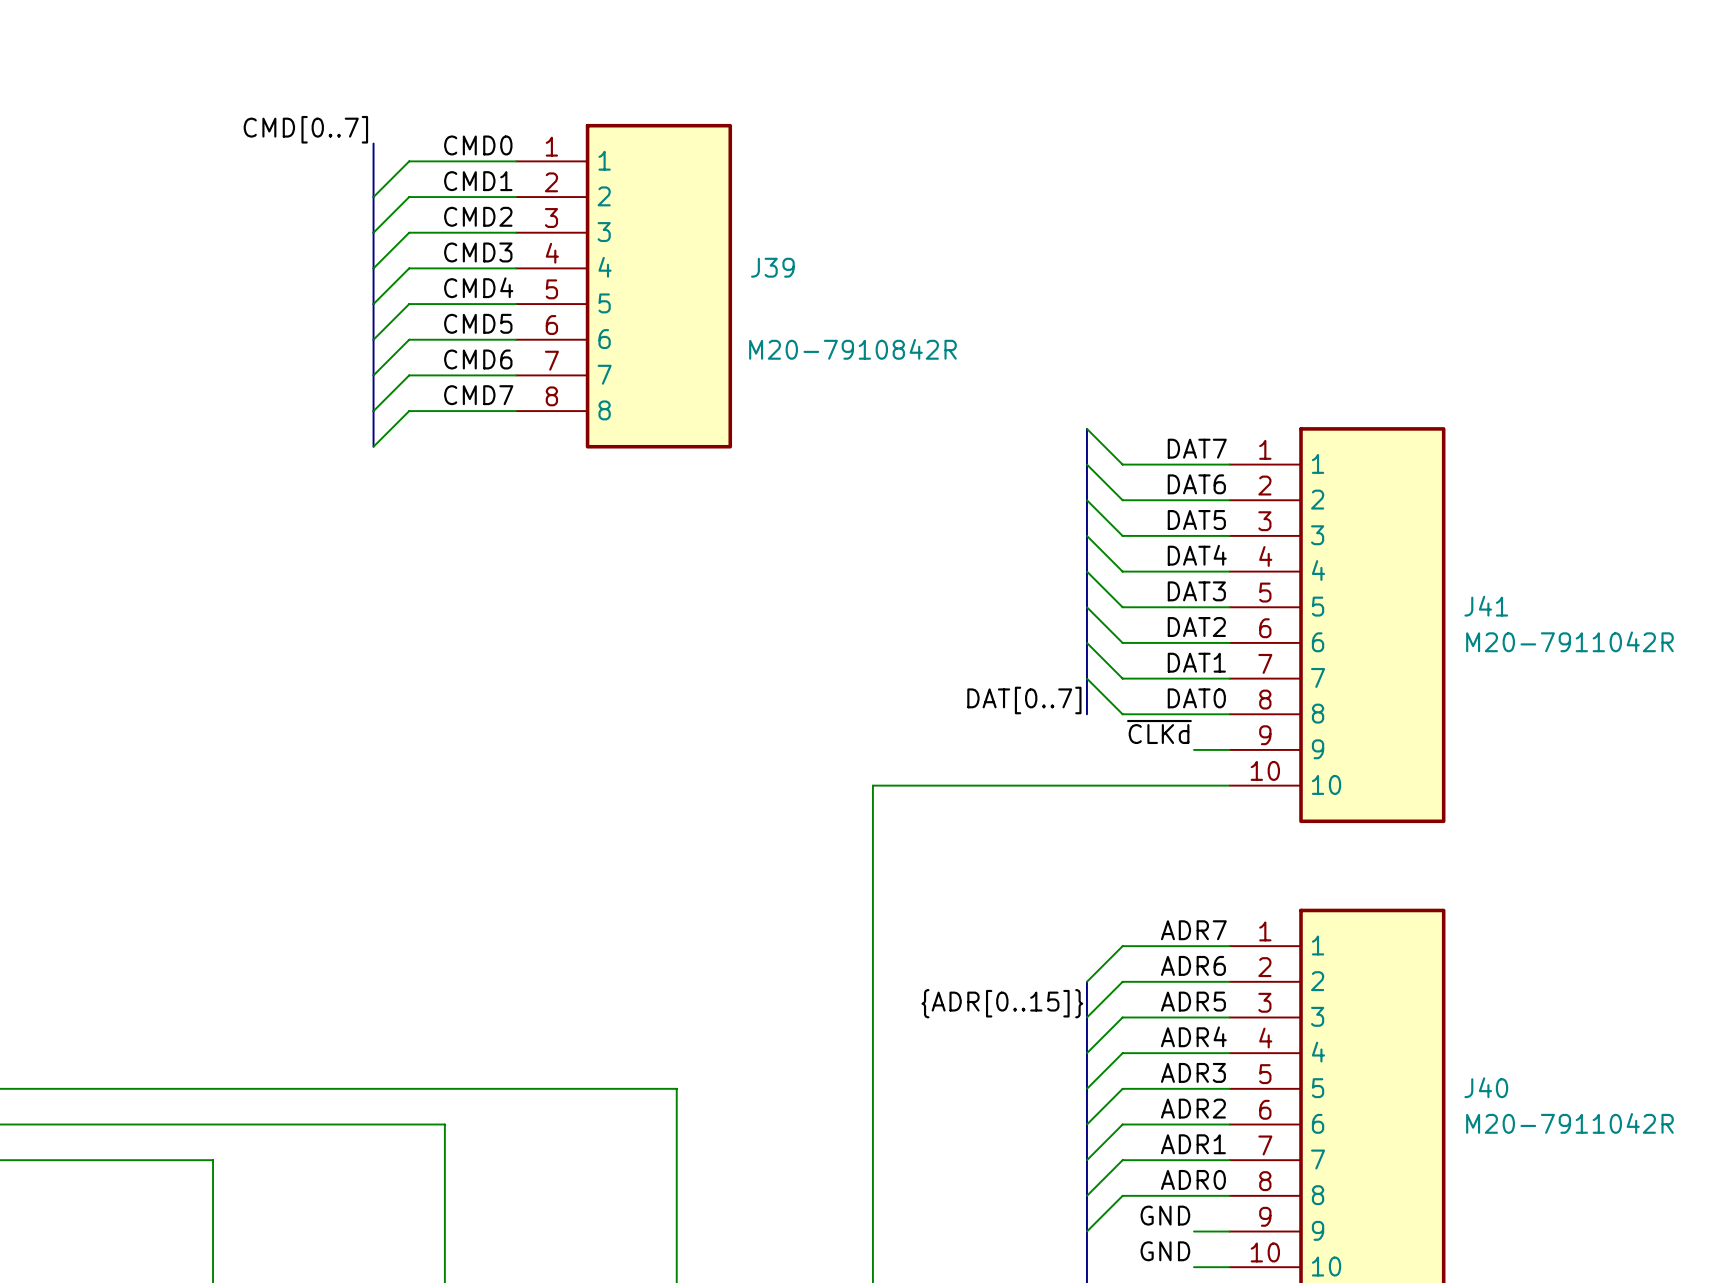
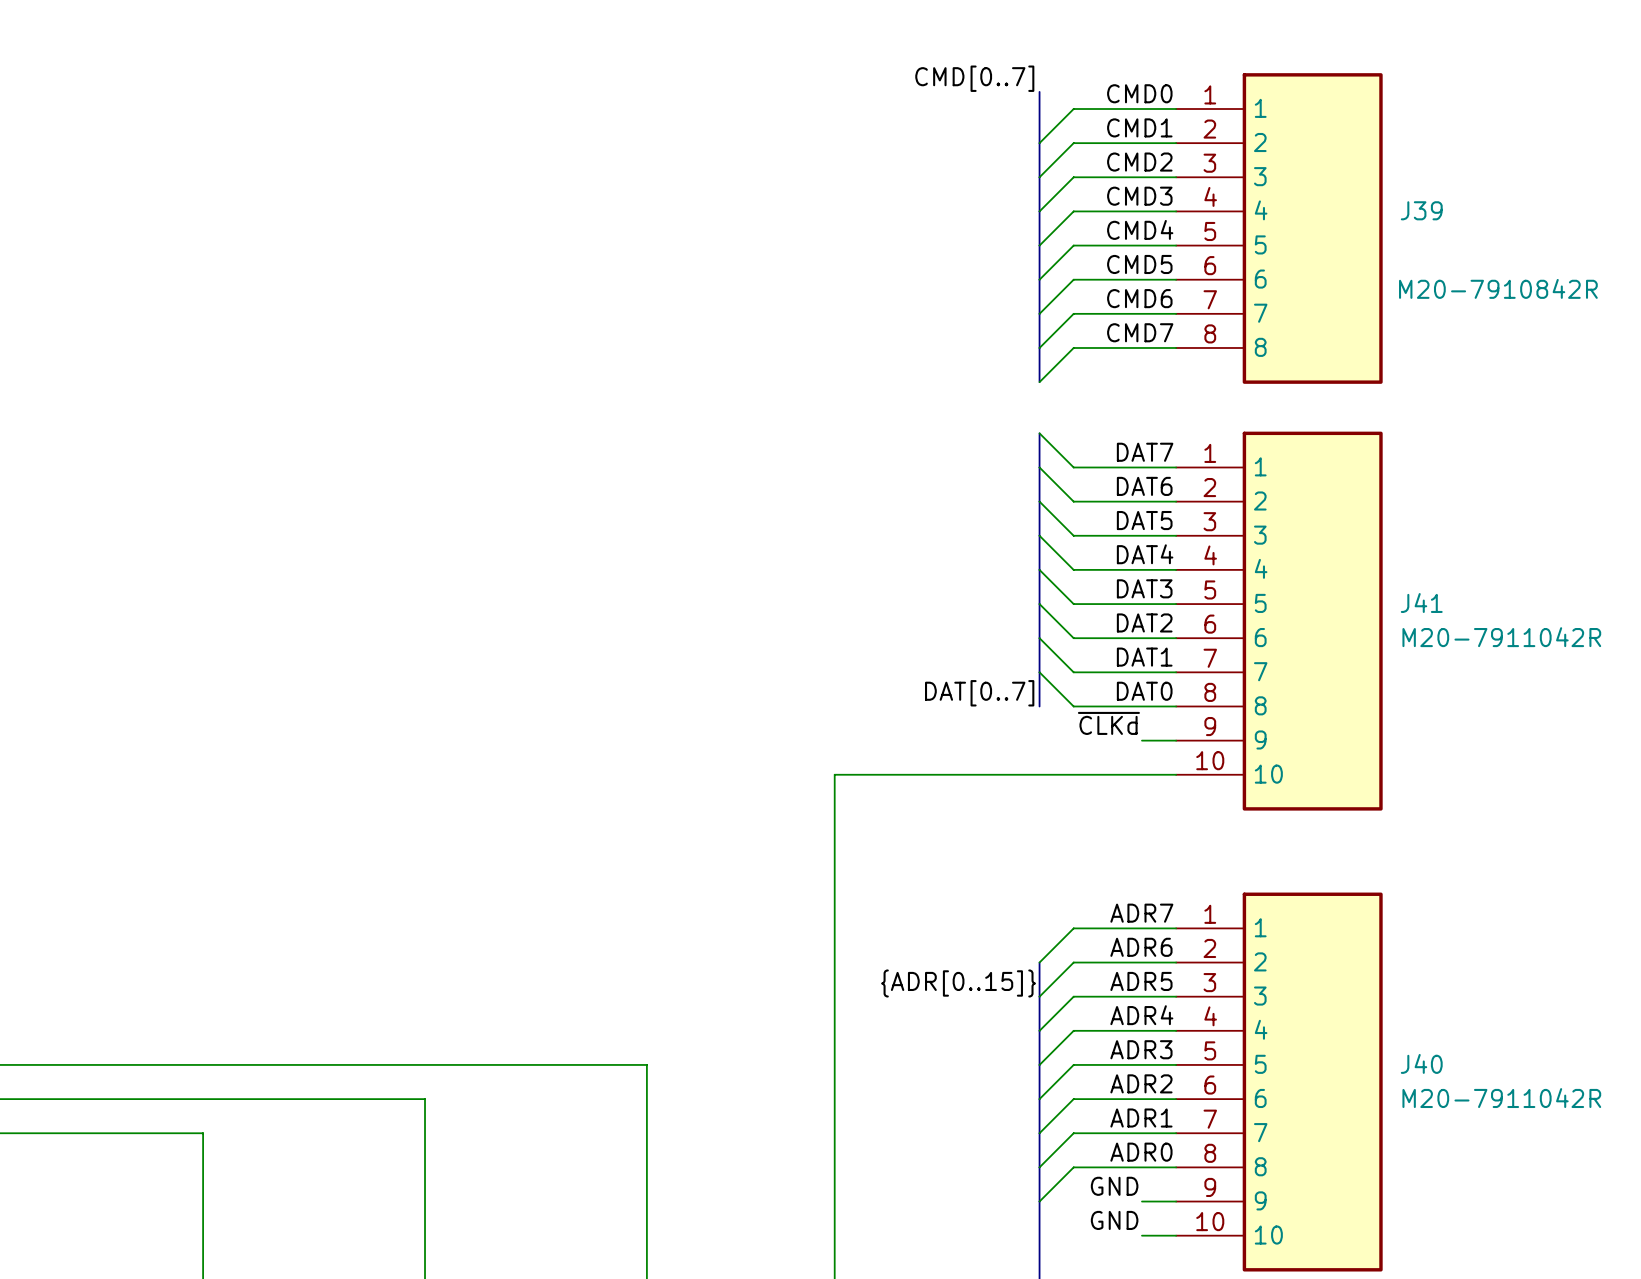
label: none -> CMD[0..7] (974, 78)
bus: none -> (1039, 91) (1039, 382)
label: none -> CMD0 (1139, 93)
wire: none -> (1176, 109) (1073, 109) (1039, 143)
label: none -> CMD1 (1139, 127)
wire: none -> (1176, 143) (1073, 143) (1039, 177)
label: CMD[0..7] (305, 129) -> none
bus: (373, 143) (373, 446) -> none
label: CMD0 (478, 145) -> none
label: none -> CMD2 (1139, 162)
wire: (516, 161) (409, 161) (373, 197) -> none
wire: none -> (1176, 177) (1073, 177) (1039, 211)
label: CMD1 (478, 181) -> none
label: none -> CMD3 (1139, 196)
wire: (516, 197) (409, 197) (373, 232) -> none
wire: none -> (1176, 211) (1073, 211) (1039, 245)
label: CMD2 (478, 216) -> none
label: none -> CMD4 (1140, 229)
wire: (516, 232) (409, 232) (373, 268) -> none
wire: none -> (1176, 245) (1073, 245) (1039, 279)
label: CMD3 (478, 252) -> none
label: none -> CMD5 (1139, 264)
wire: (516, 268) (409, 268) (373, 304) -> none
wire: none -> (1176, 279) (1073, 279) (1039, 313)
J39 position: (624, 286) -> (1279, 228)
label: CMD4 (478, 287) -> none
label: none -> CMD6 (1139, 298)
wire: (516, 304) (409, 304) (373, 339) -> none
wire: none -> (1176, 313) (1073, 313) (1039, 347)
label: CMD5 (478, 323) -> none
label: none -> CMD7 (1140, 332)
wire: (516, 339) (409, 339) (373, 375) -> none
wire: none -> (1176, 347) (1073, 347) (1039, 382)
label: CMD6 (478, 359) -> none
wire: (516, 375) (409, 375) (373, 411) -> none
label: CMD7 (478, 395) -> none
wire: (516, 411) (409, 411) (373, 446) -> none

